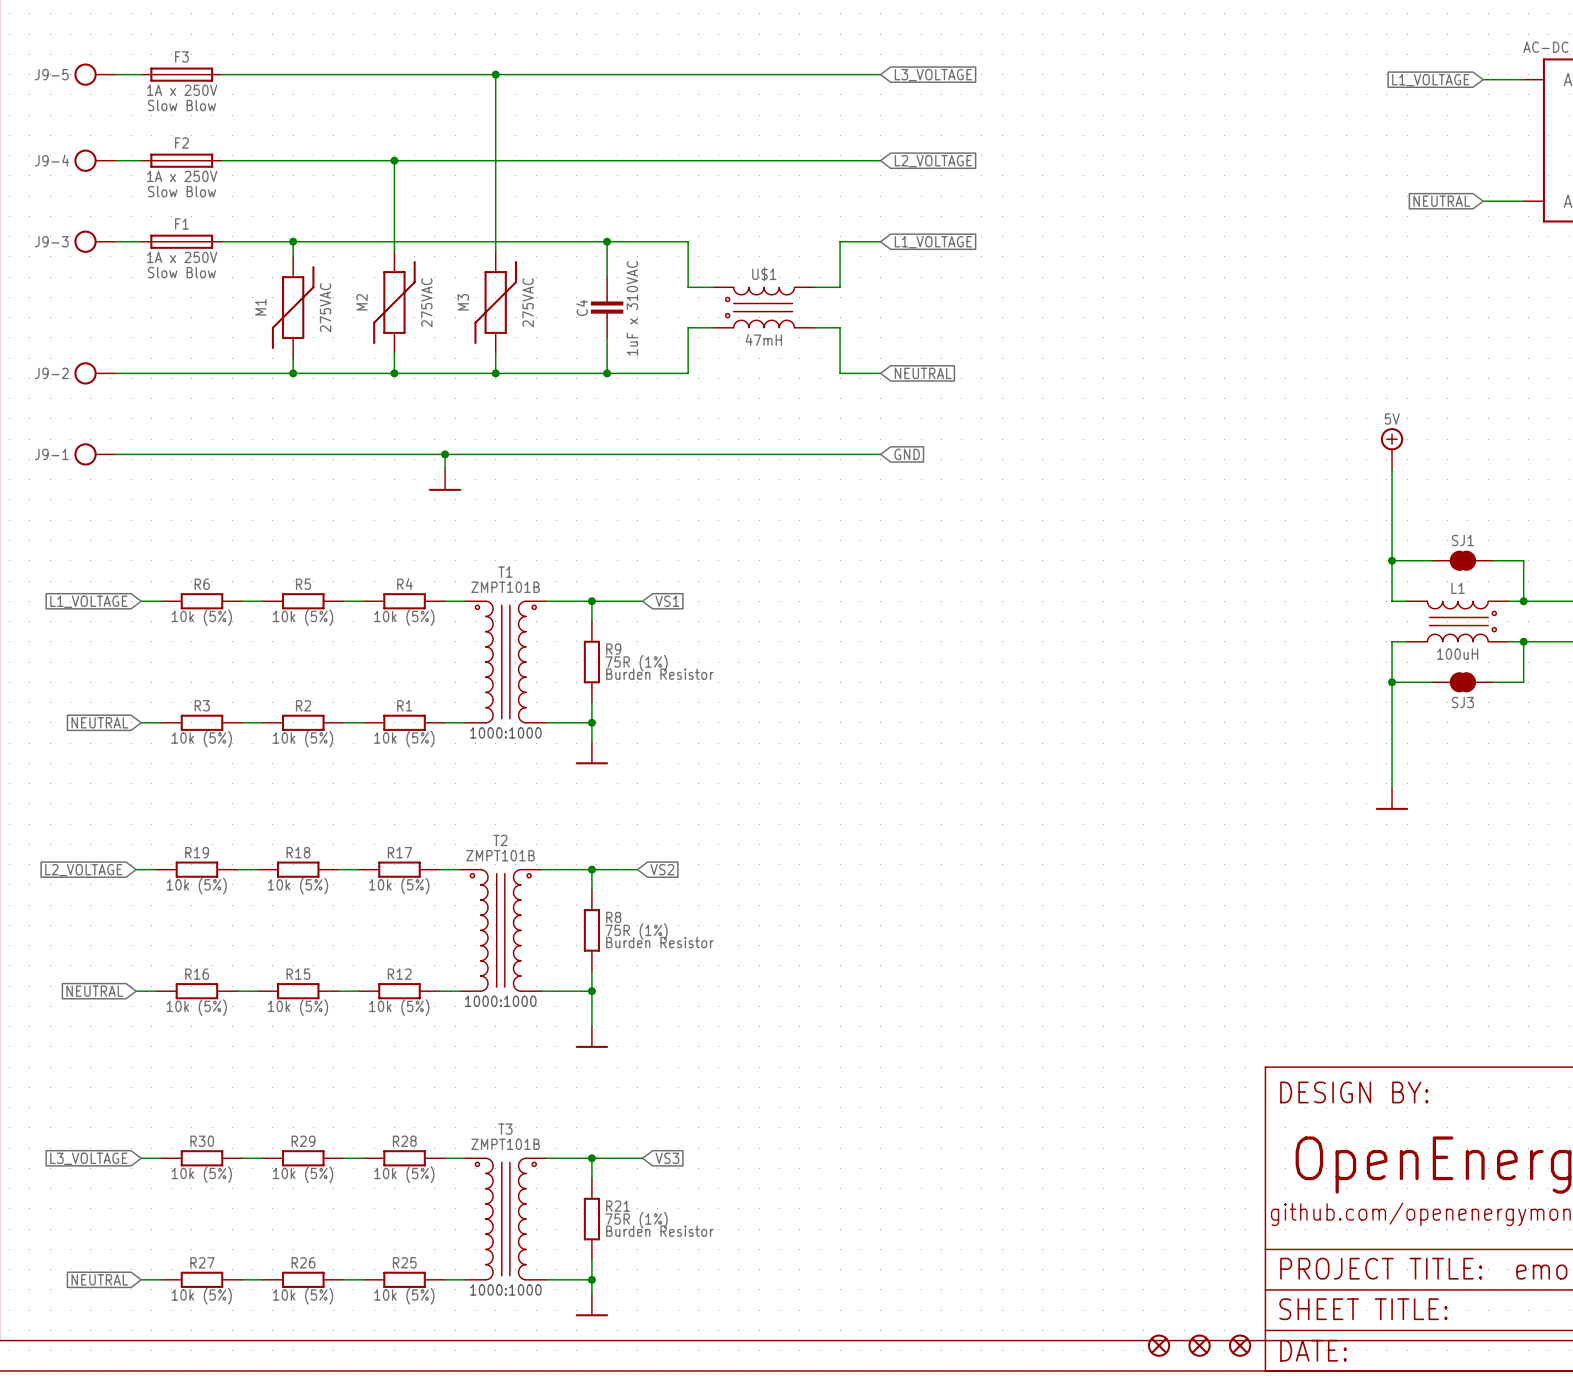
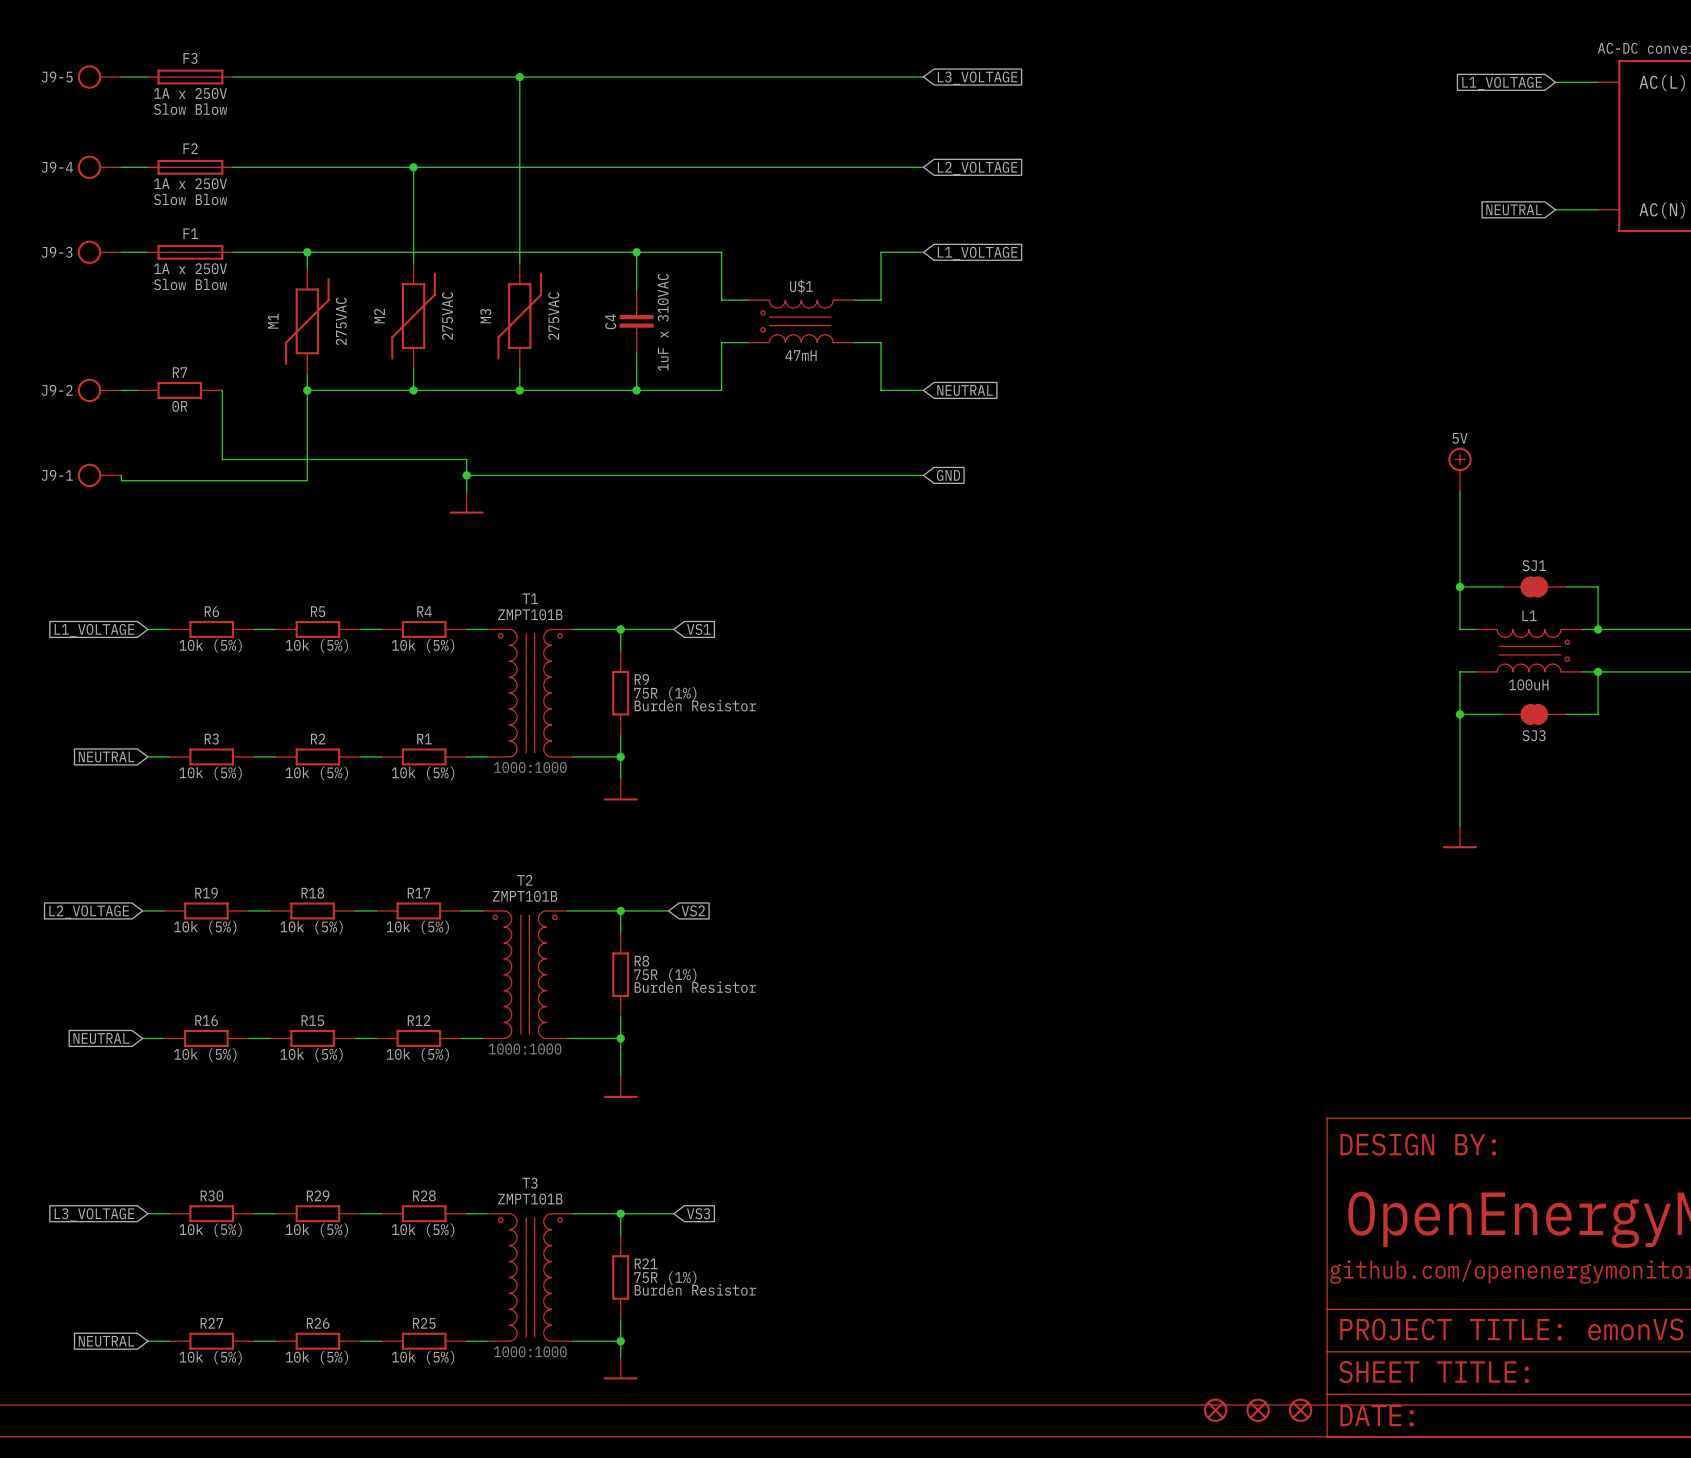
wire: (131, 373) (293, 373) -> (121, 475) (121, 480) (307, 480) (307, 390)
R7: none -> 0R (179, 390)
wire: (115, 454) (445, 454) -> (222, 390) (222, 459) (466, 459) (466, 475)

